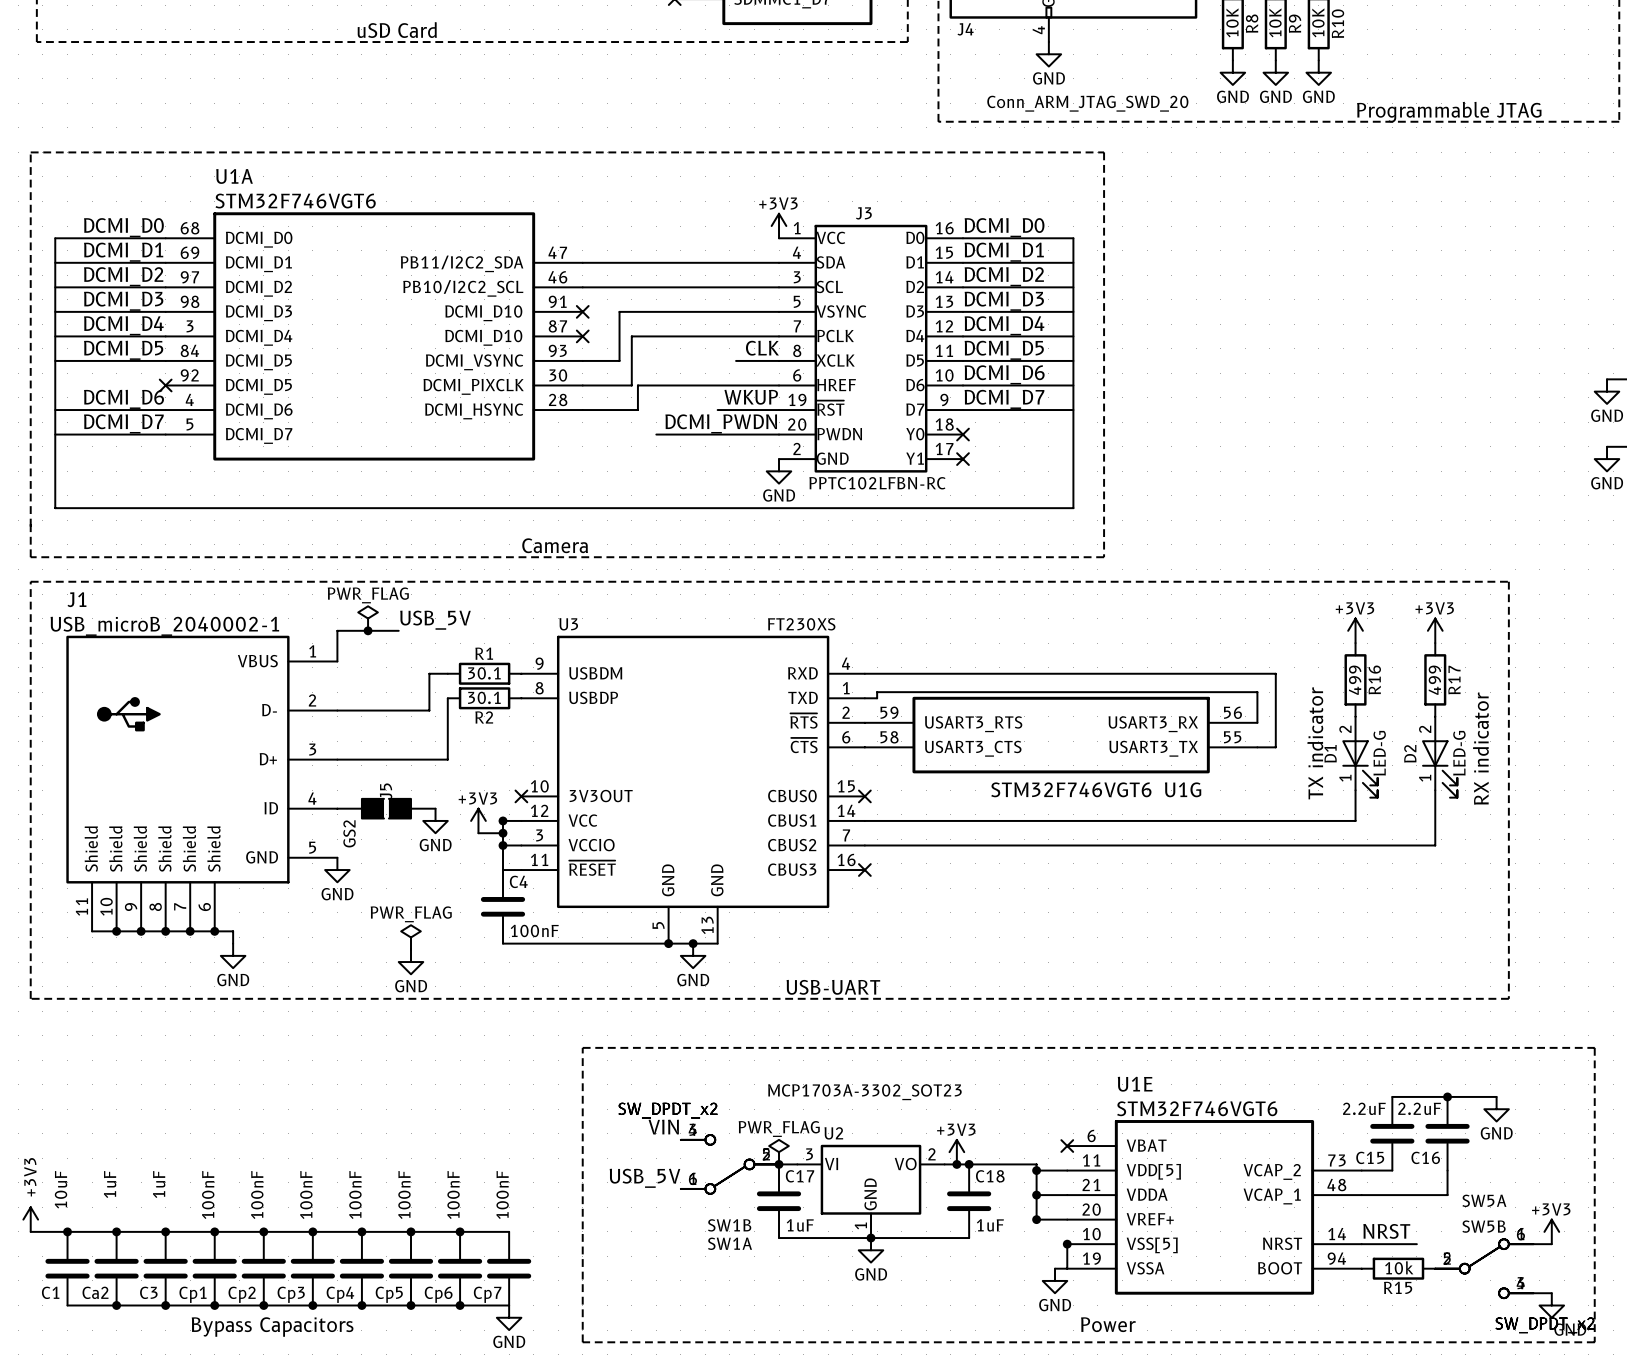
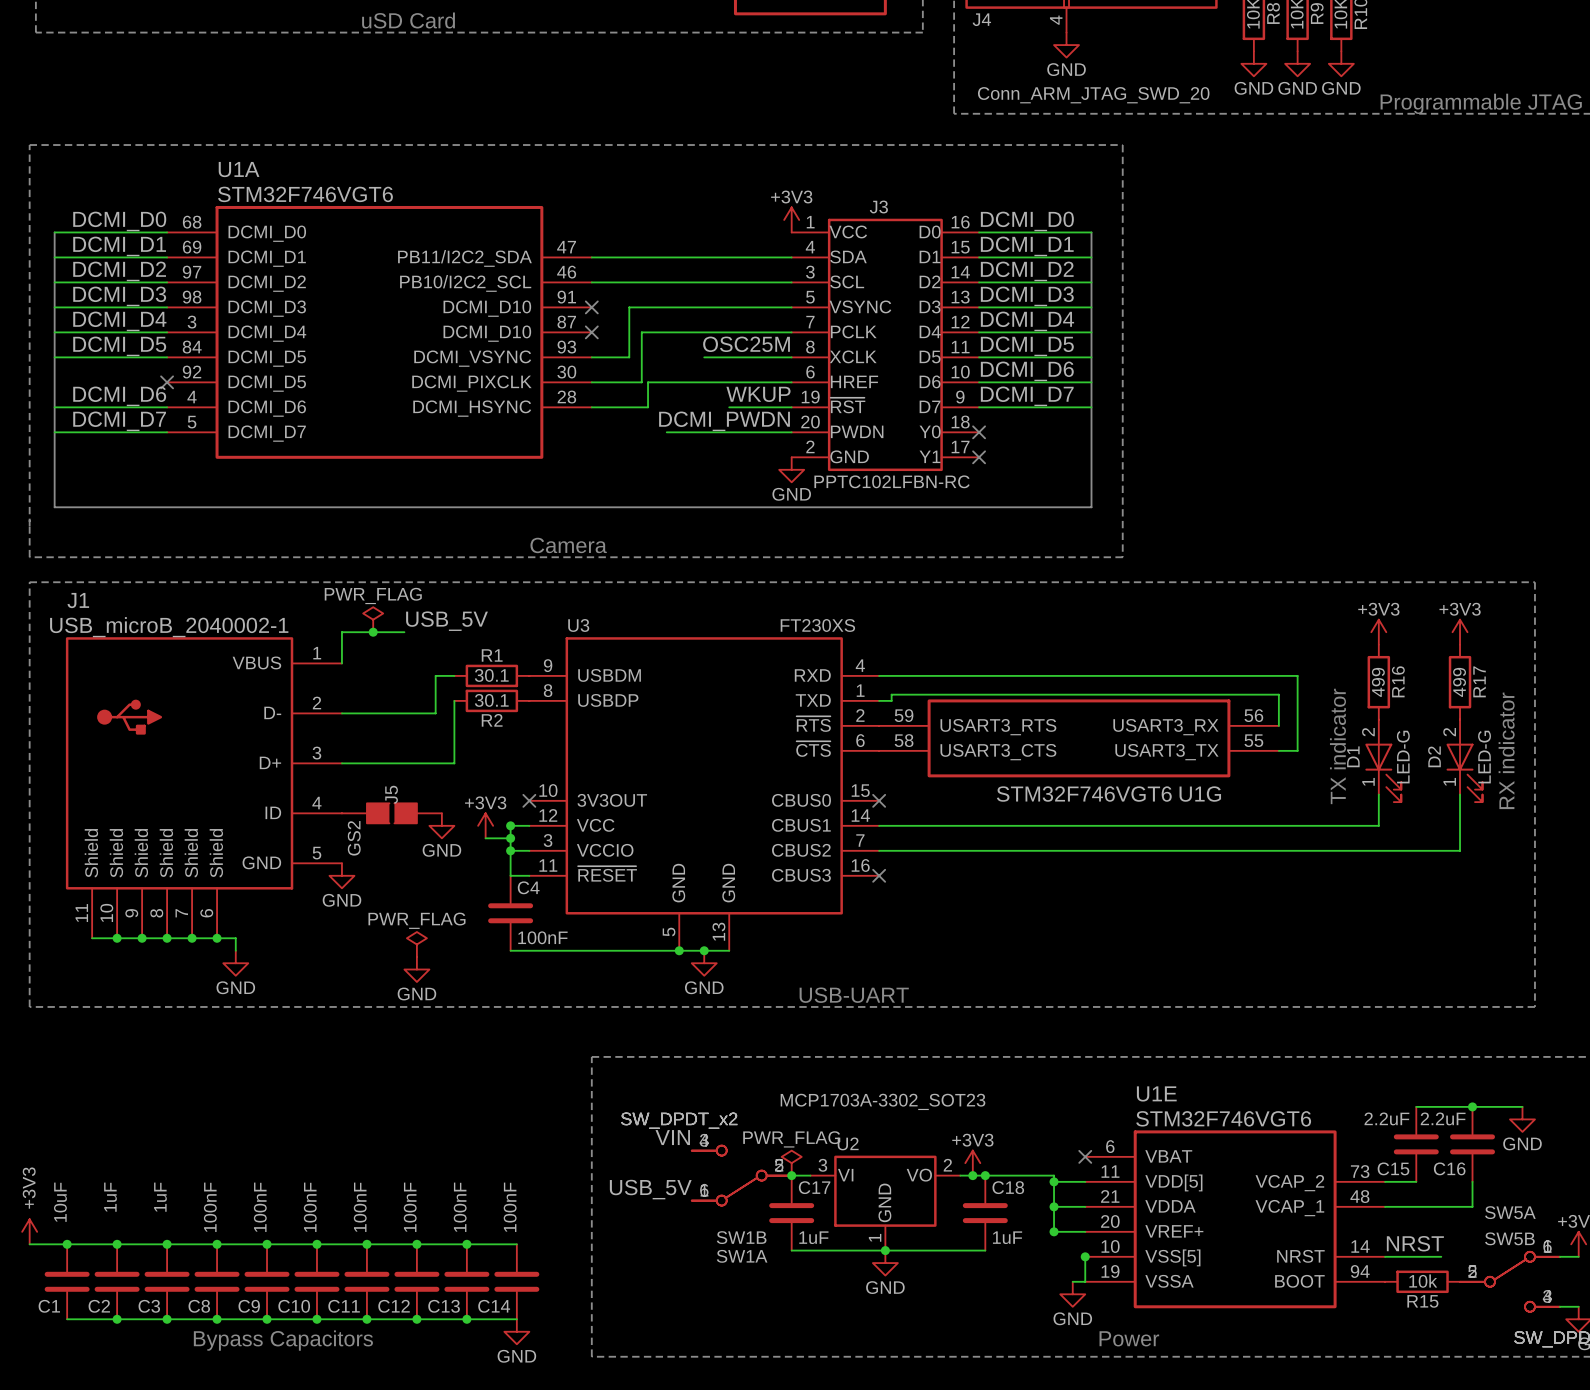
label: CLK (762, 348) -> OSC25M (746, 344)
wire: none -> (704, 357) (747, 357)
Ca2 name: Ca2 (95, 1292) -> C2 (99, 1306)
Cp1 name: Cp1 (193, 1294) -> C8 (199, 1306)
Cp2 name: Cp2 (242, 1294) -> C9 (249, 1306)
Cp3 name: Cp3 (291, 1294) -> C10 (294, 1306)
Cp4 name: Cp4 (340, 1294) -> C11 (344, 1306)
Cp5 name: Cp5 (389, 1294) -> C12 (394, 1306)
Cp6 name: Cp6 (438, 1294) -> C13 (444, 1306)
Cp7 name: Cp7 (487, 1294) -> C14 (494, 1306)

